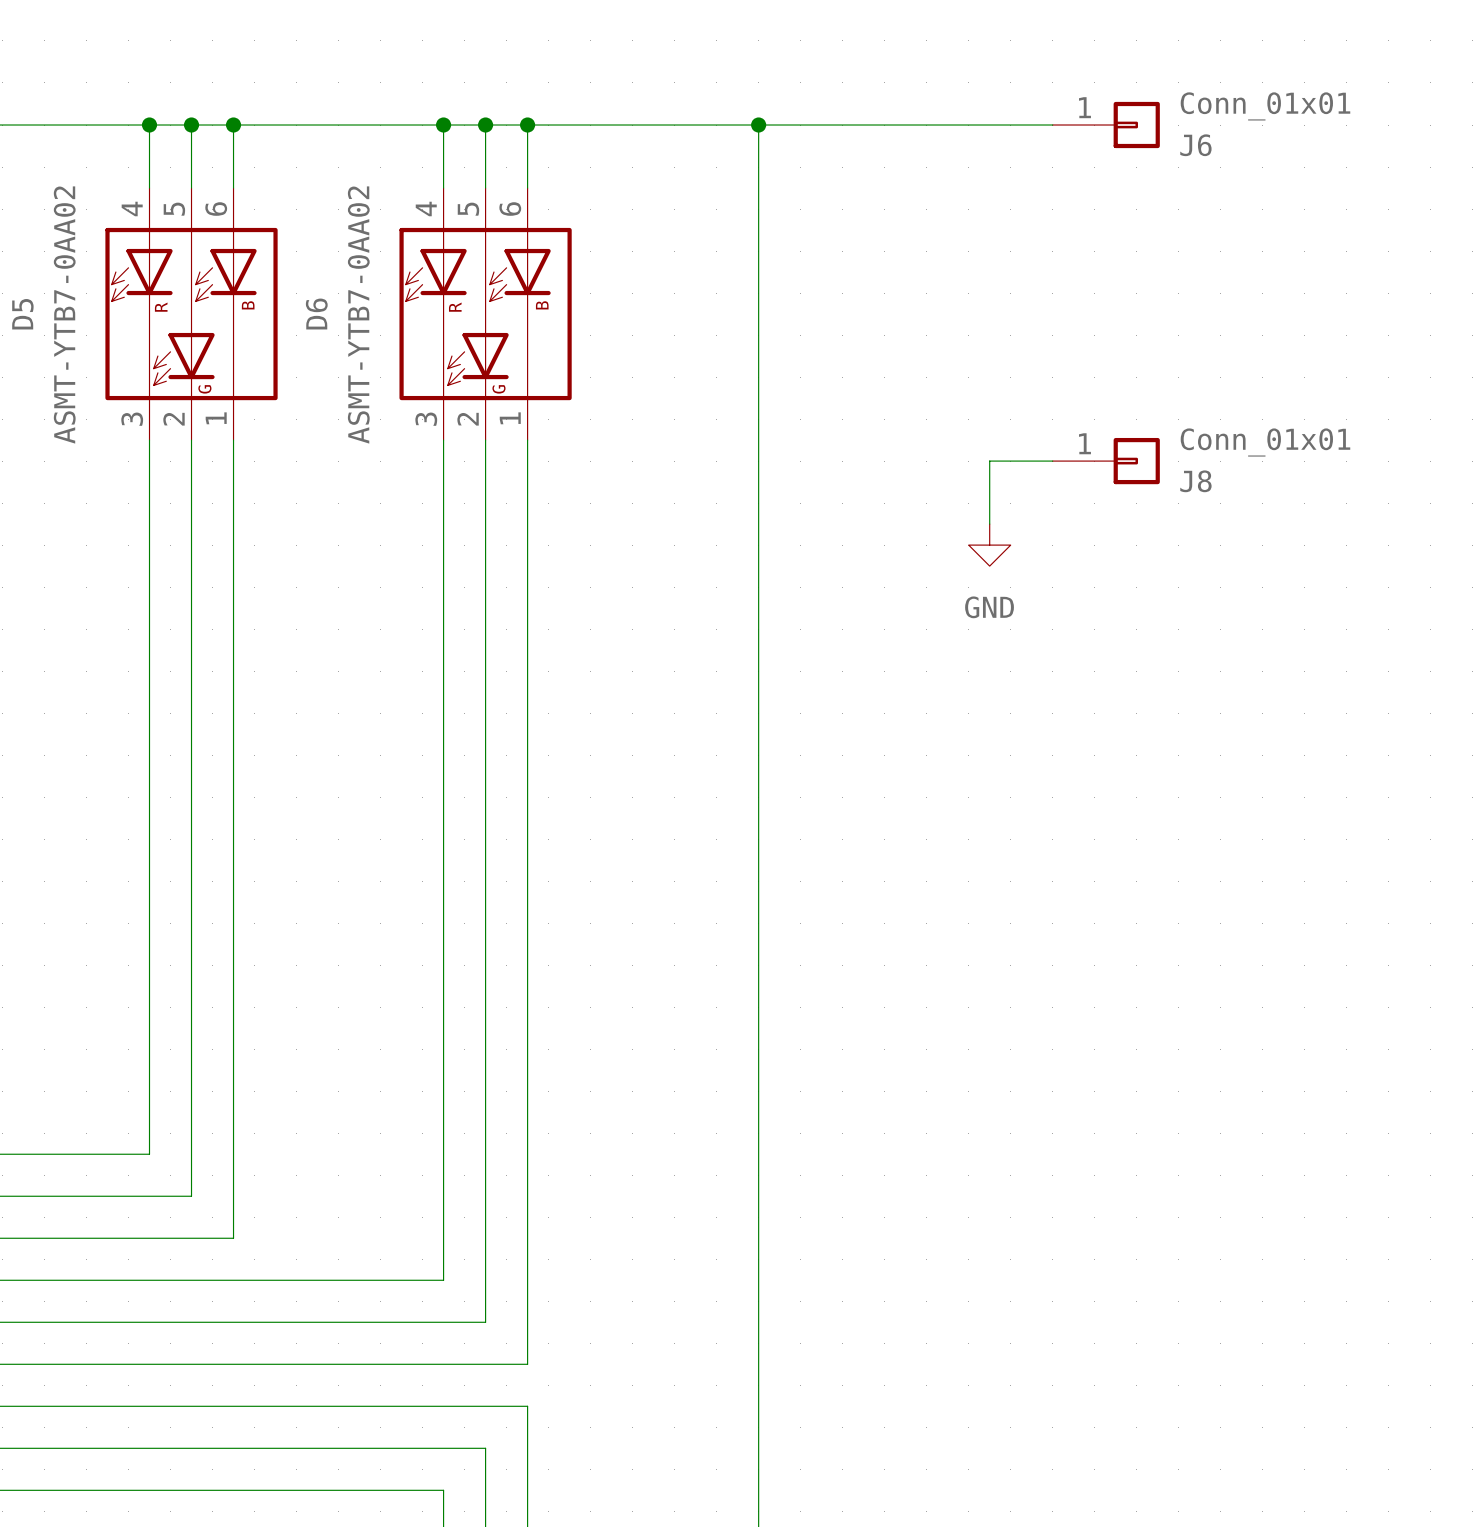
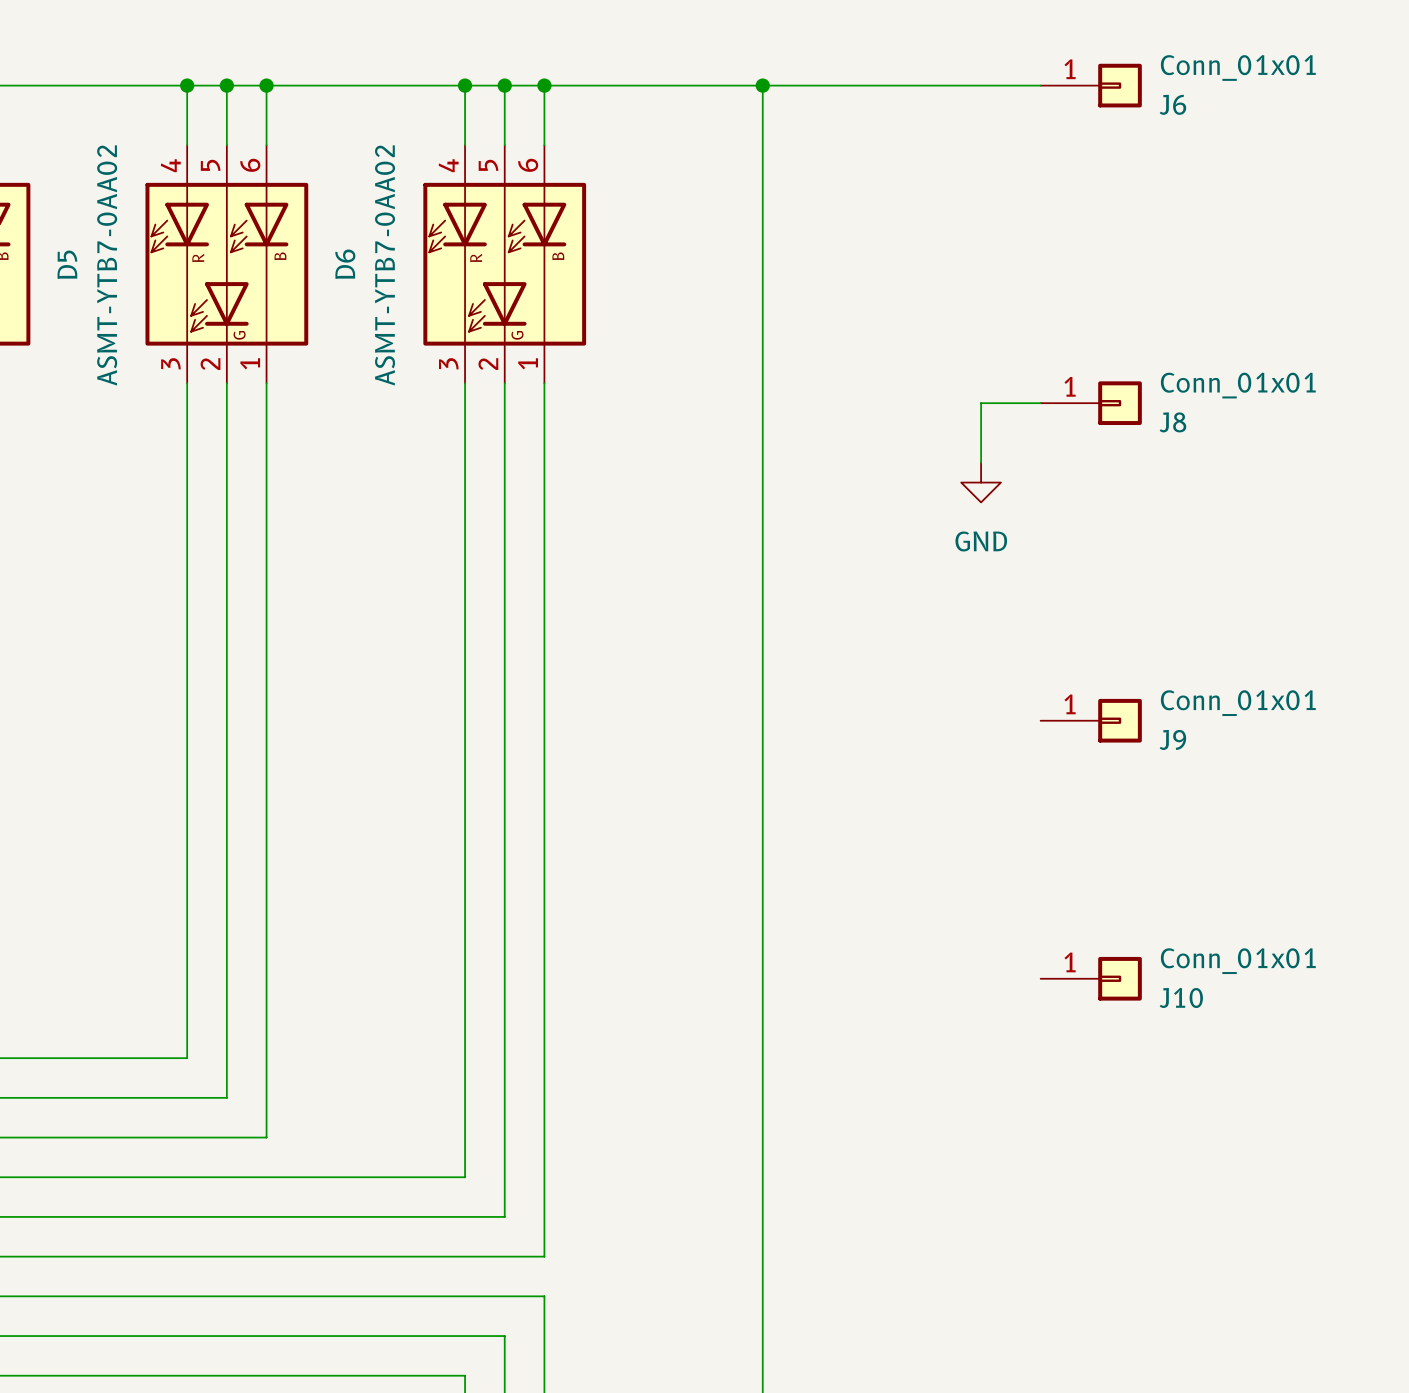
J9: none -> Conn_01x01 (1091, 720)
J10: none -> Conn_01x01 (1091, 978)

